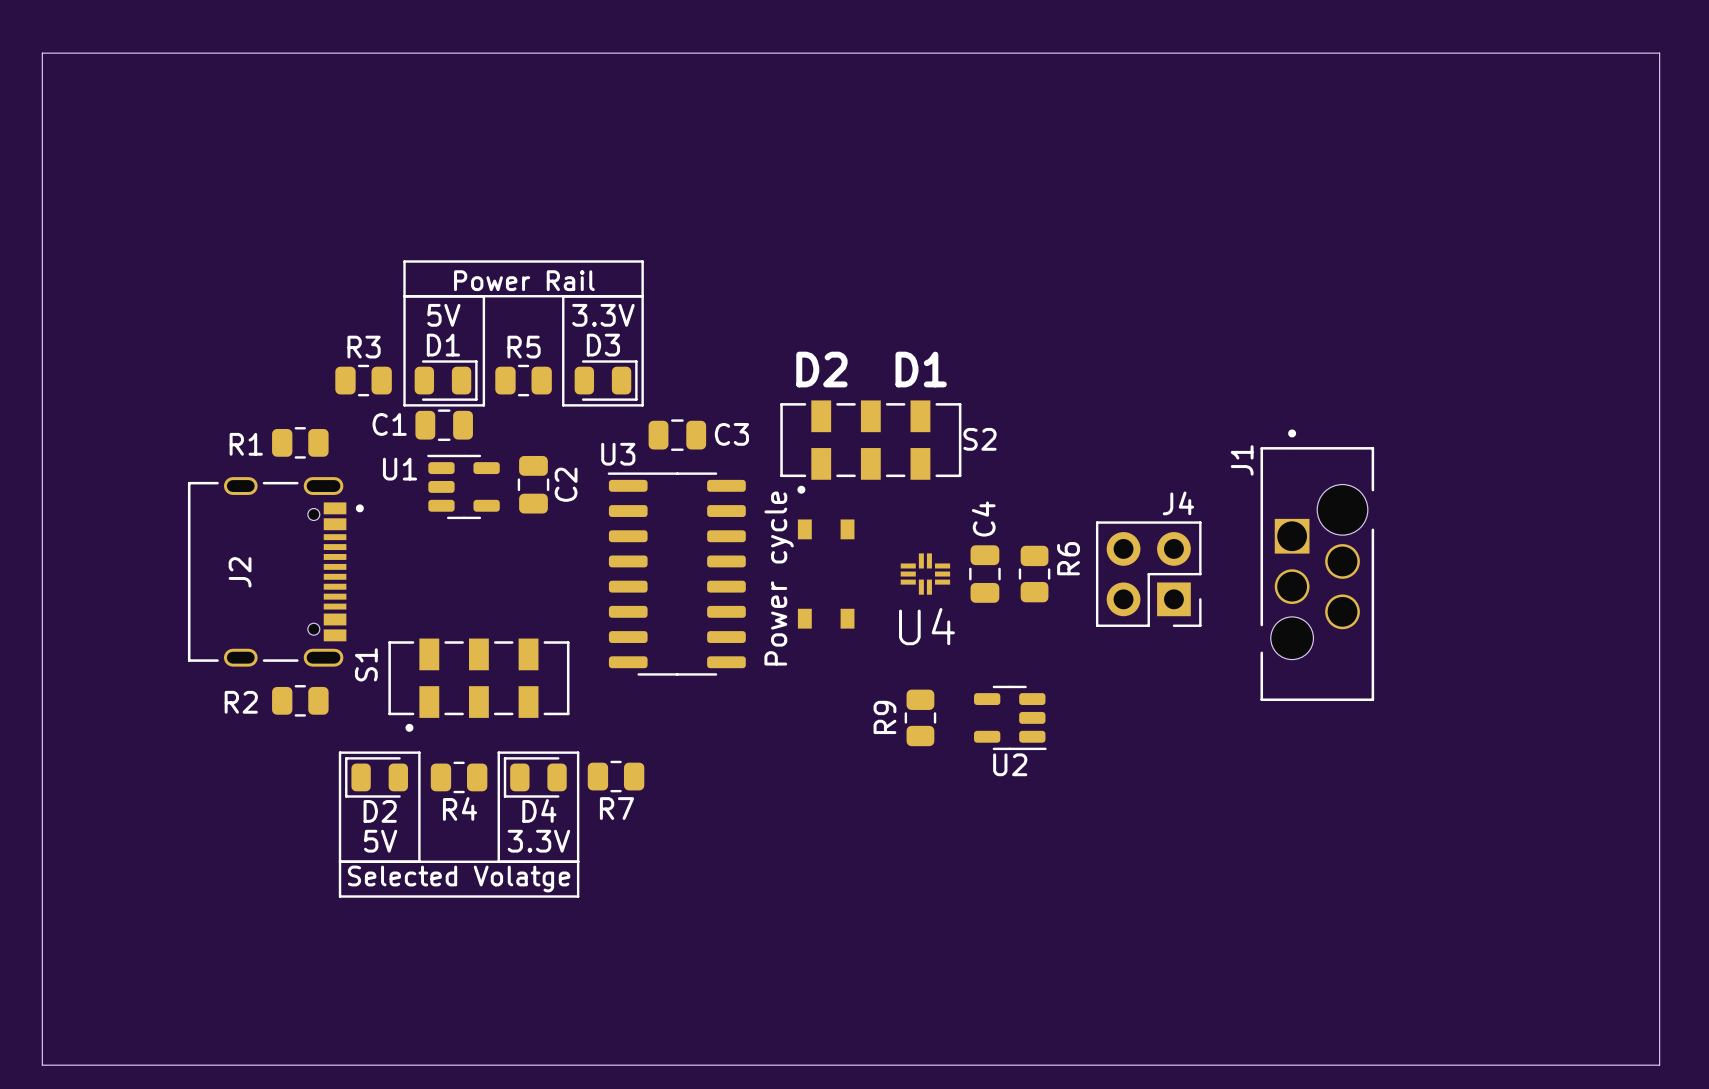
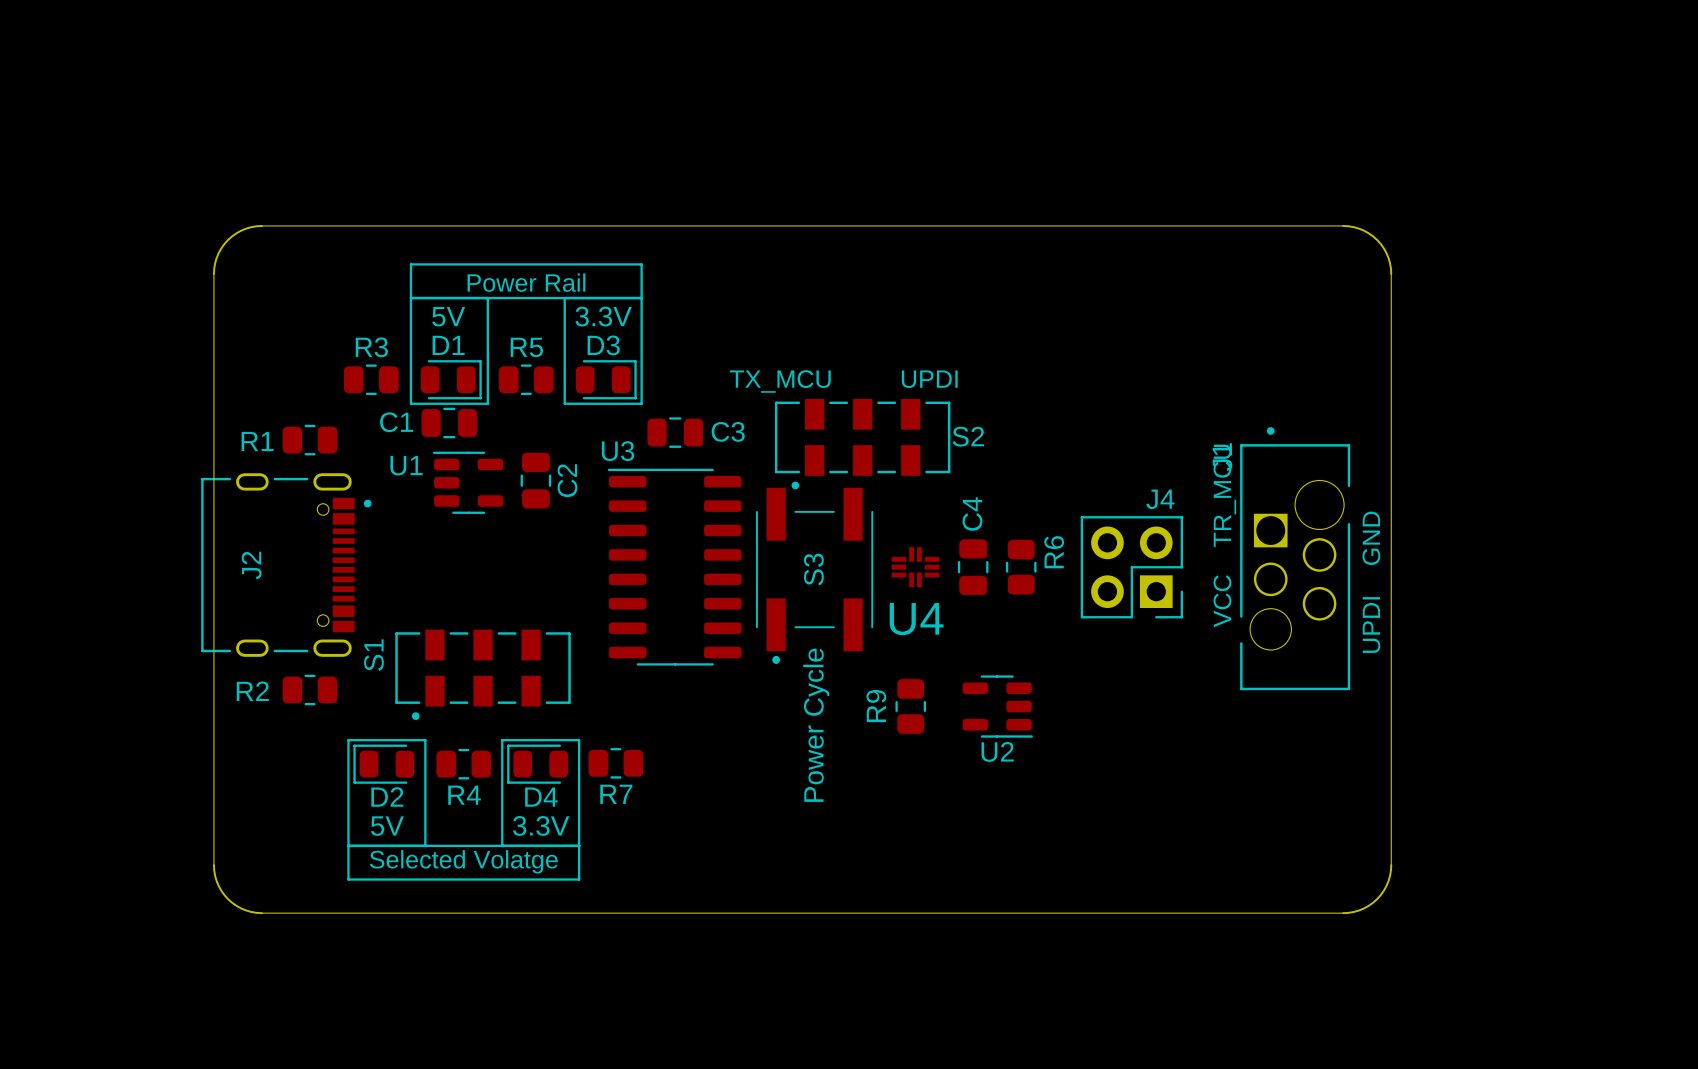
board edge: (42, 53) (1659, 53) (1659, 1065) (42, 1065) (42, 53) -> (261, 225) (246, 228) (228, 240) (216, 258) (213, 274) (213, 865) (216, 880) (221, 890) (236, 905) (246, 910) (261, 913) (1343, 913) (1364, 908) (1373, 902) (1383, 890) (1388, 880) (1391, 865) (1391, 274) (1388, 258) (1383, 248) (1368, 233) (1359, 228) (1343, 225) (261, 225)
text: D2 (821, 369) -> none
text: D1 (921, 369) -> none
text: none -> UPDI (929, 379)
text: none -> TX_MCU (780, 381)
text: none -> TR_MCU (1224, 495)
text: none -> GND (1371, 538)
part: Power cycle (826, 574) -> none
S3: none -> Power Cycle (814, 575)
text: none -> VCC (1222, 601)
text: none -> UPDI (1371, 625)

